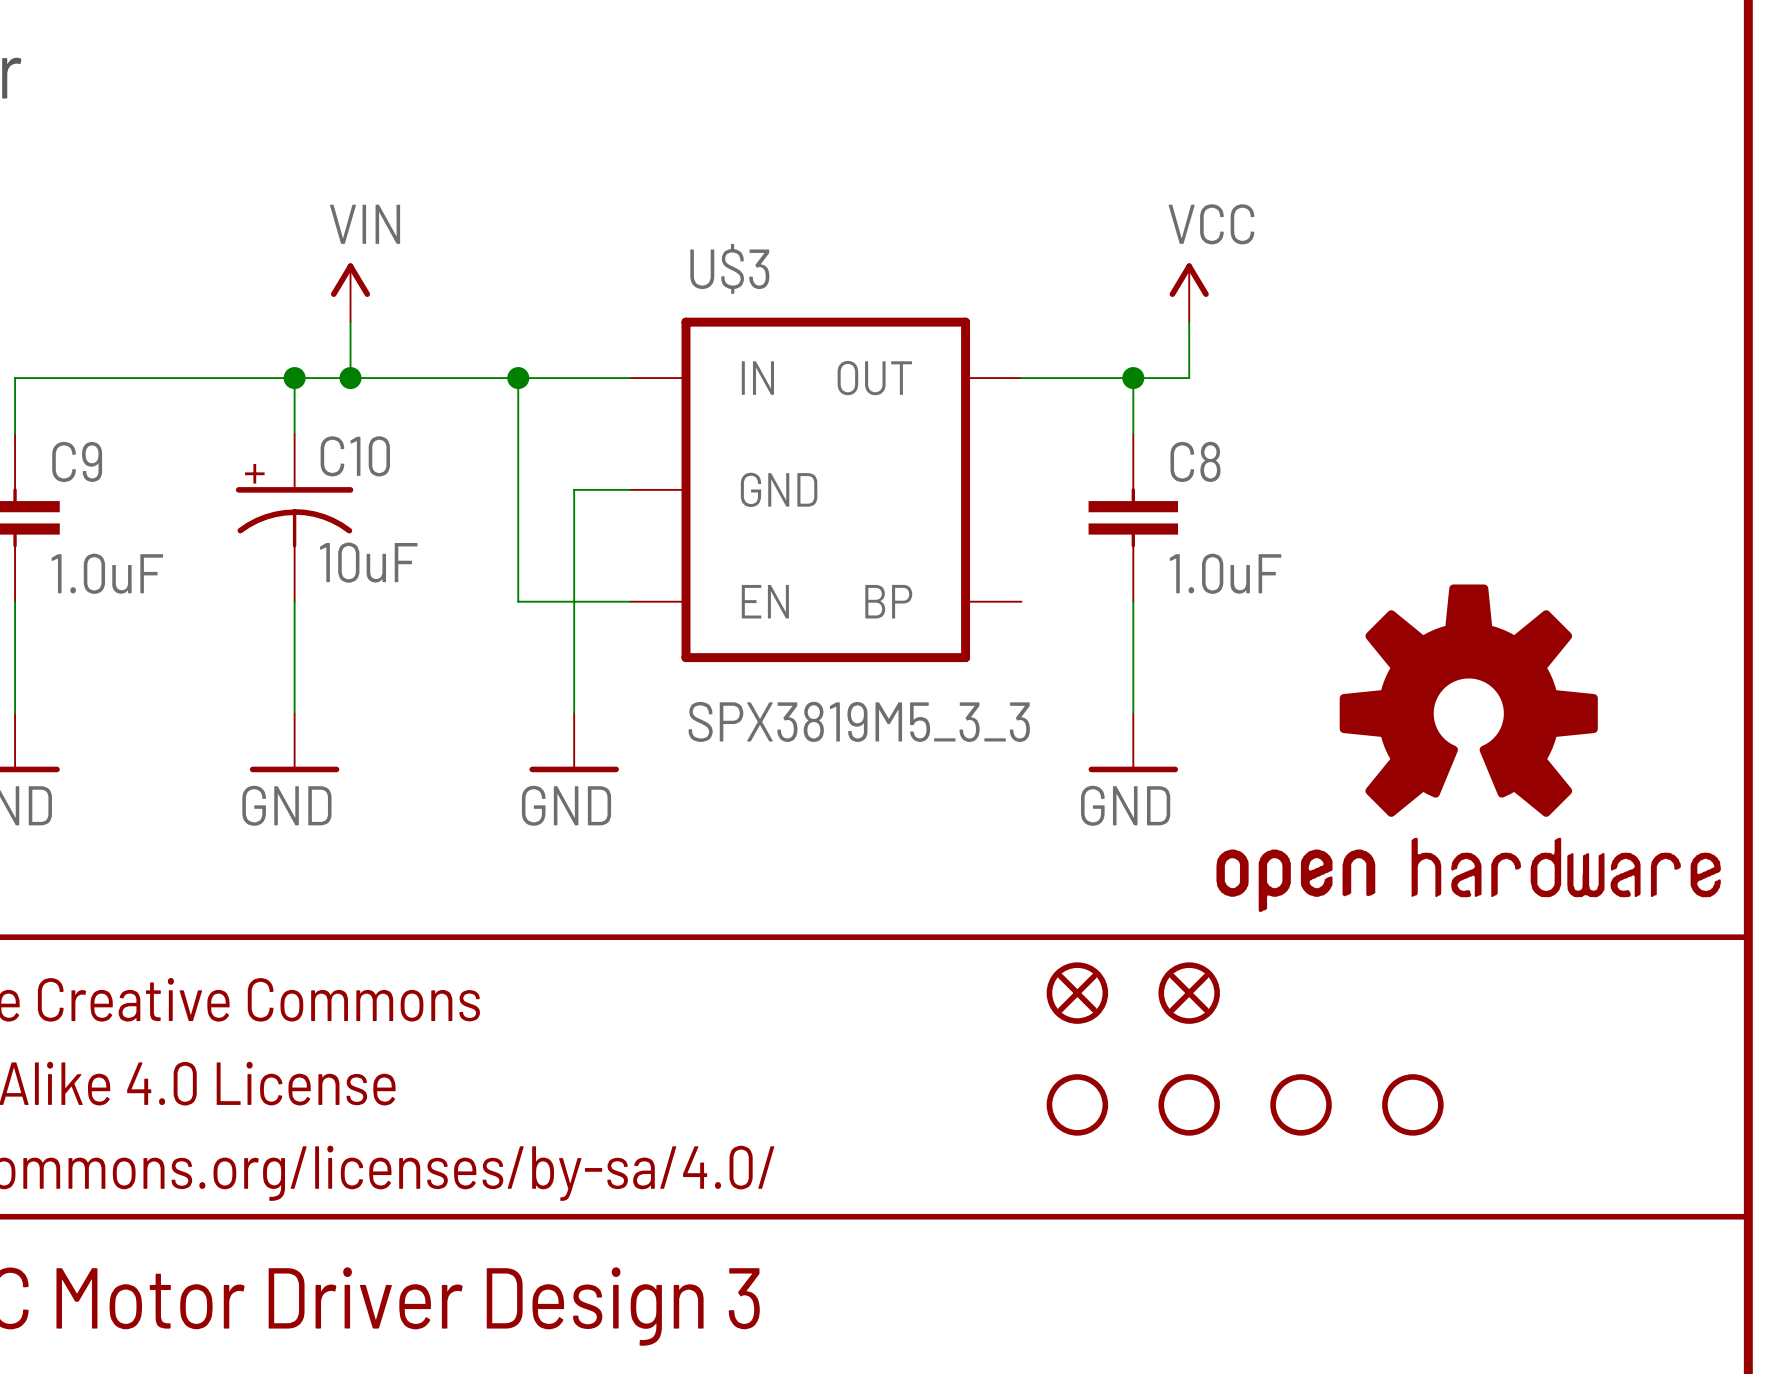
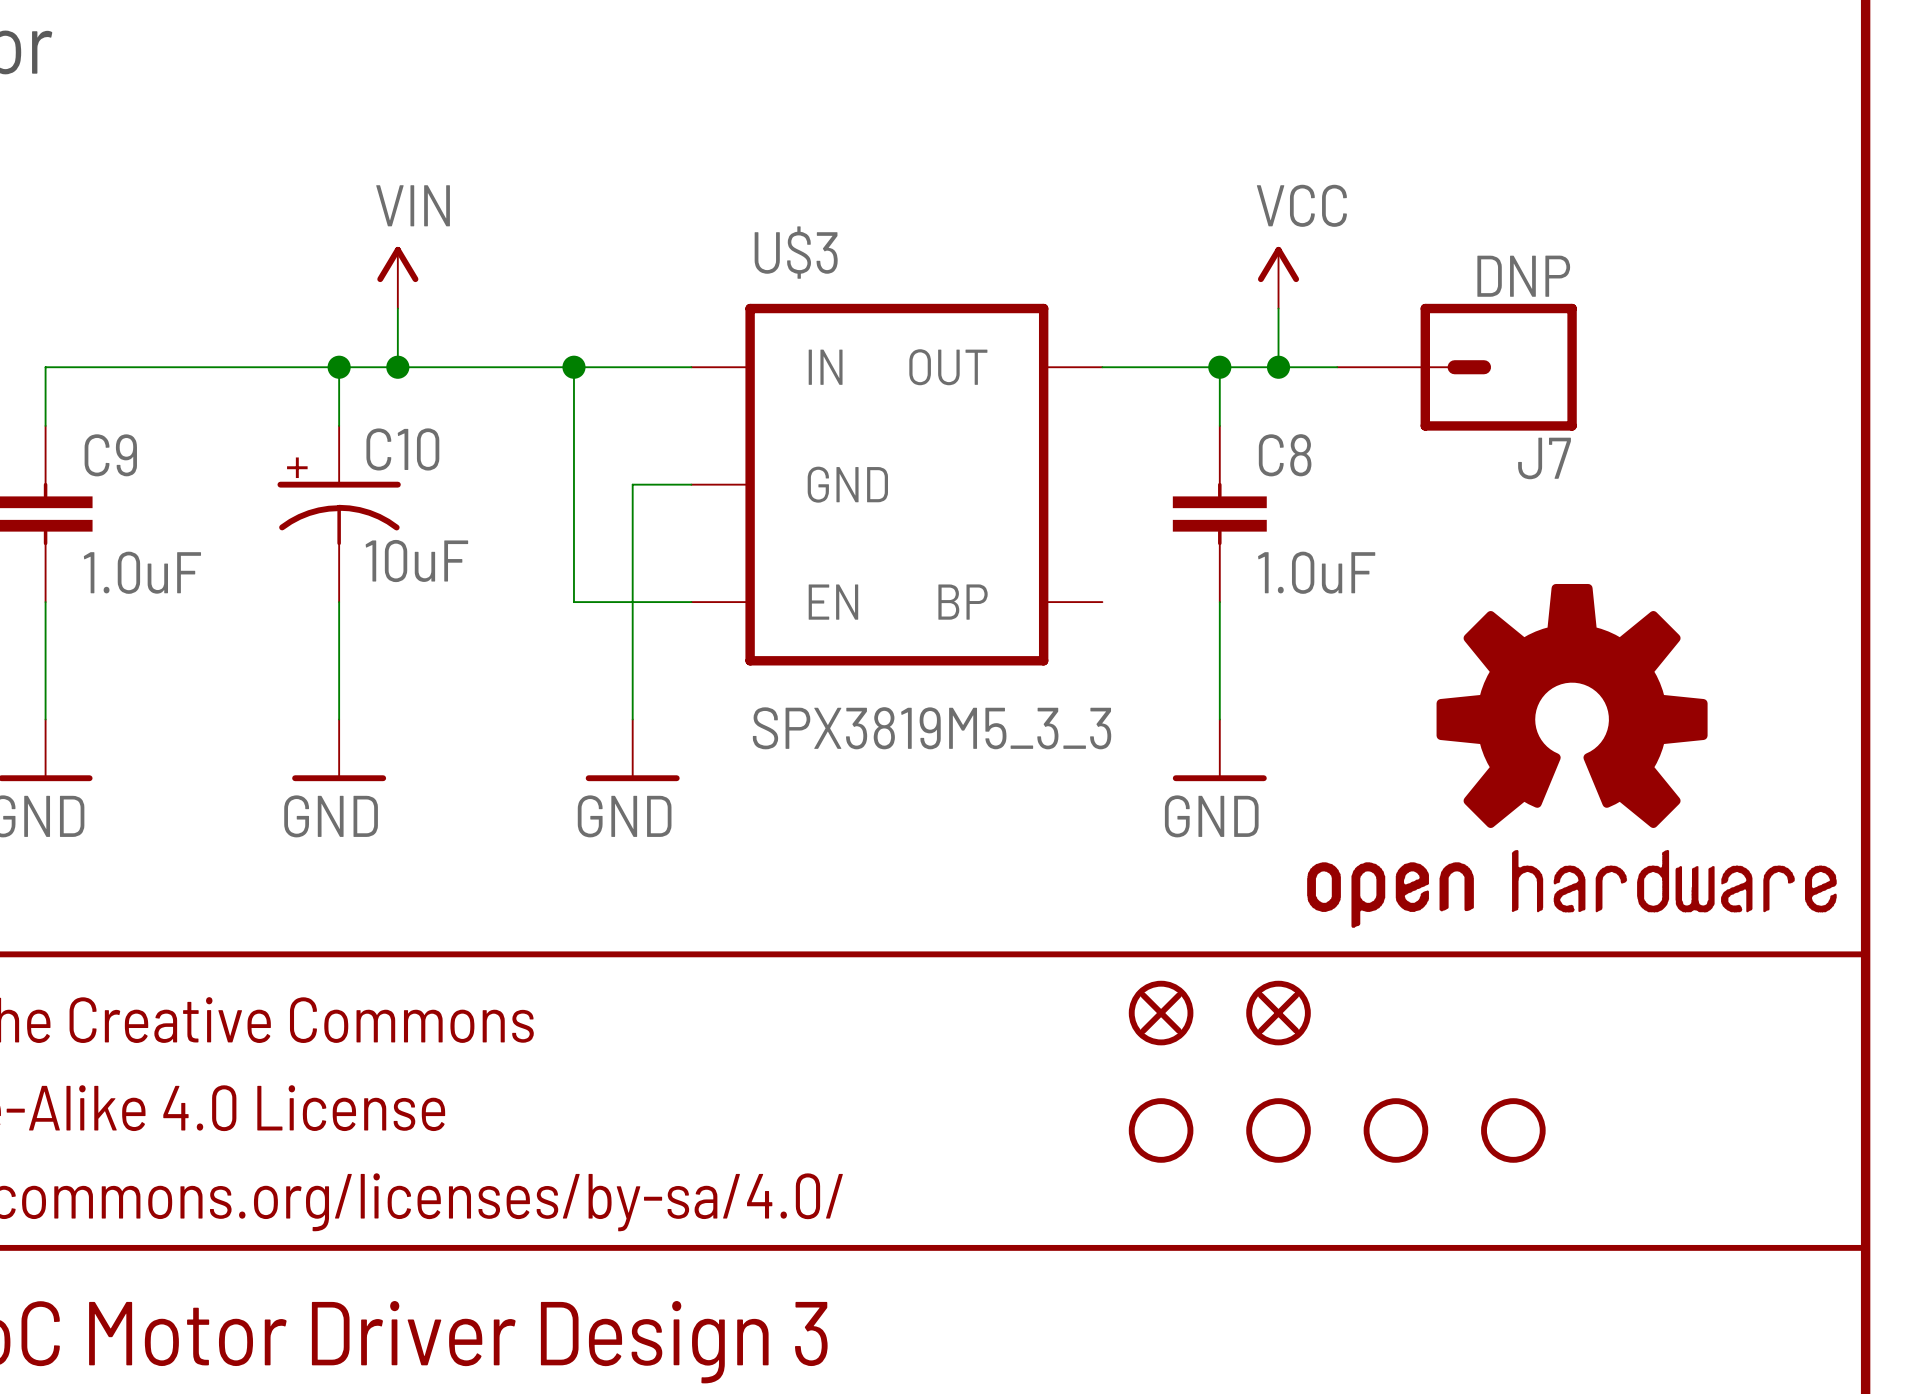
wire: none -> (1278, 367) (1337, 367)
junction: none -> (1278, 367)
J7: none -> DNP (1457, 367)

